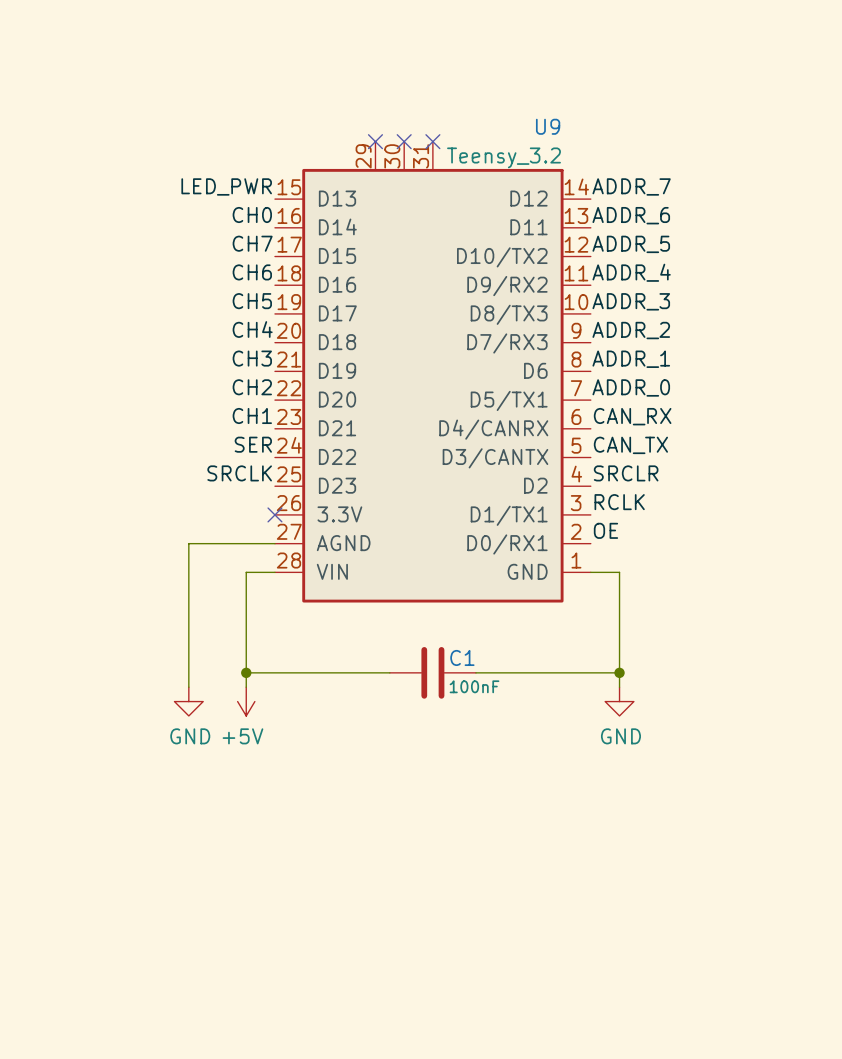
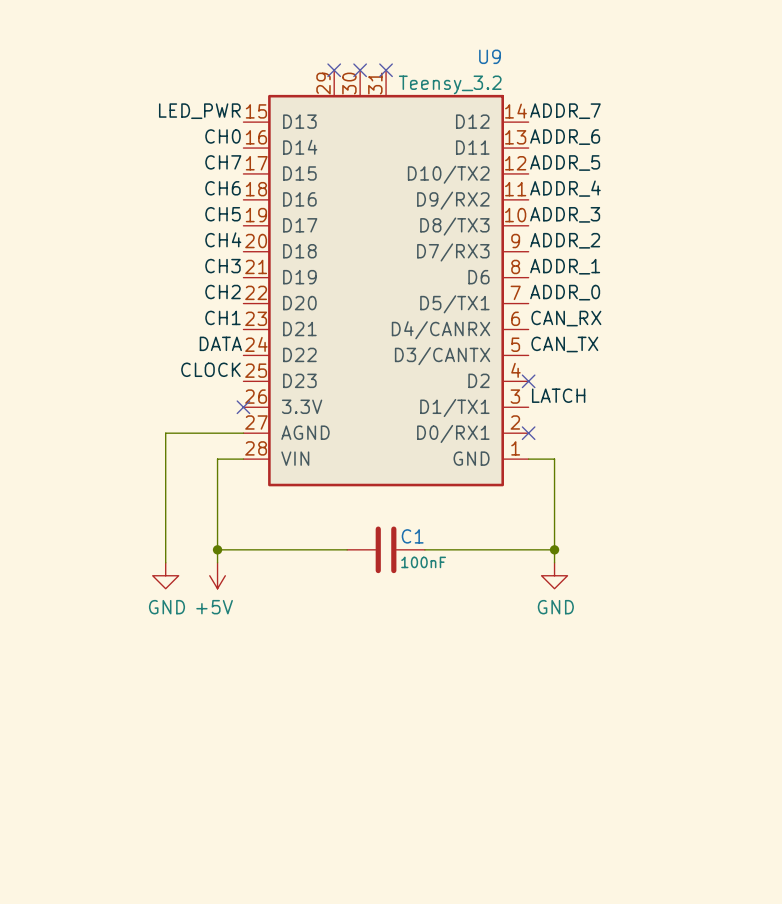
label: SER (253, 444) -> DATA (220, 343)
label: SRCLK (239, 473) -> CLOCK (210, 369)
label: SRCLR (626, 473) -> none
no-connect mark: none -> (528, 381)
label: RCLK (619, 502) -> LATCH (558, 395)
label: OE (605, 530) -> none
no-connect mark: none -> (528, 433)

